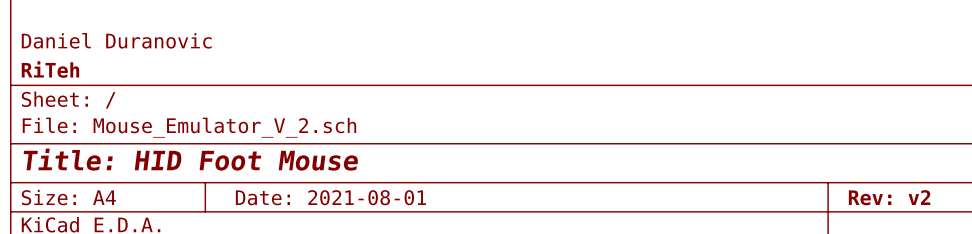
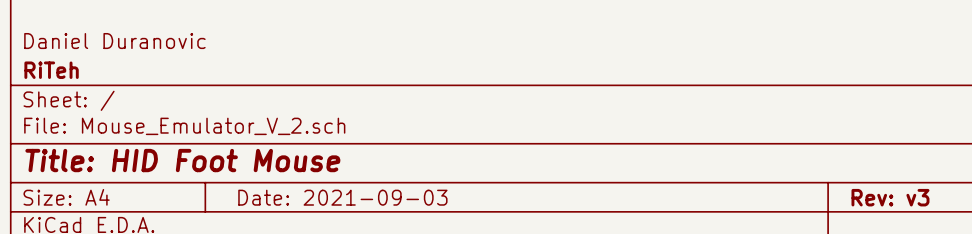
title block: Date: 2021-08-01 (330, 197) -> Date: 2021-09-03 (342, 197)
title block: Rev: v2 (889, 197) -> Rev: v3 (890, 197)

